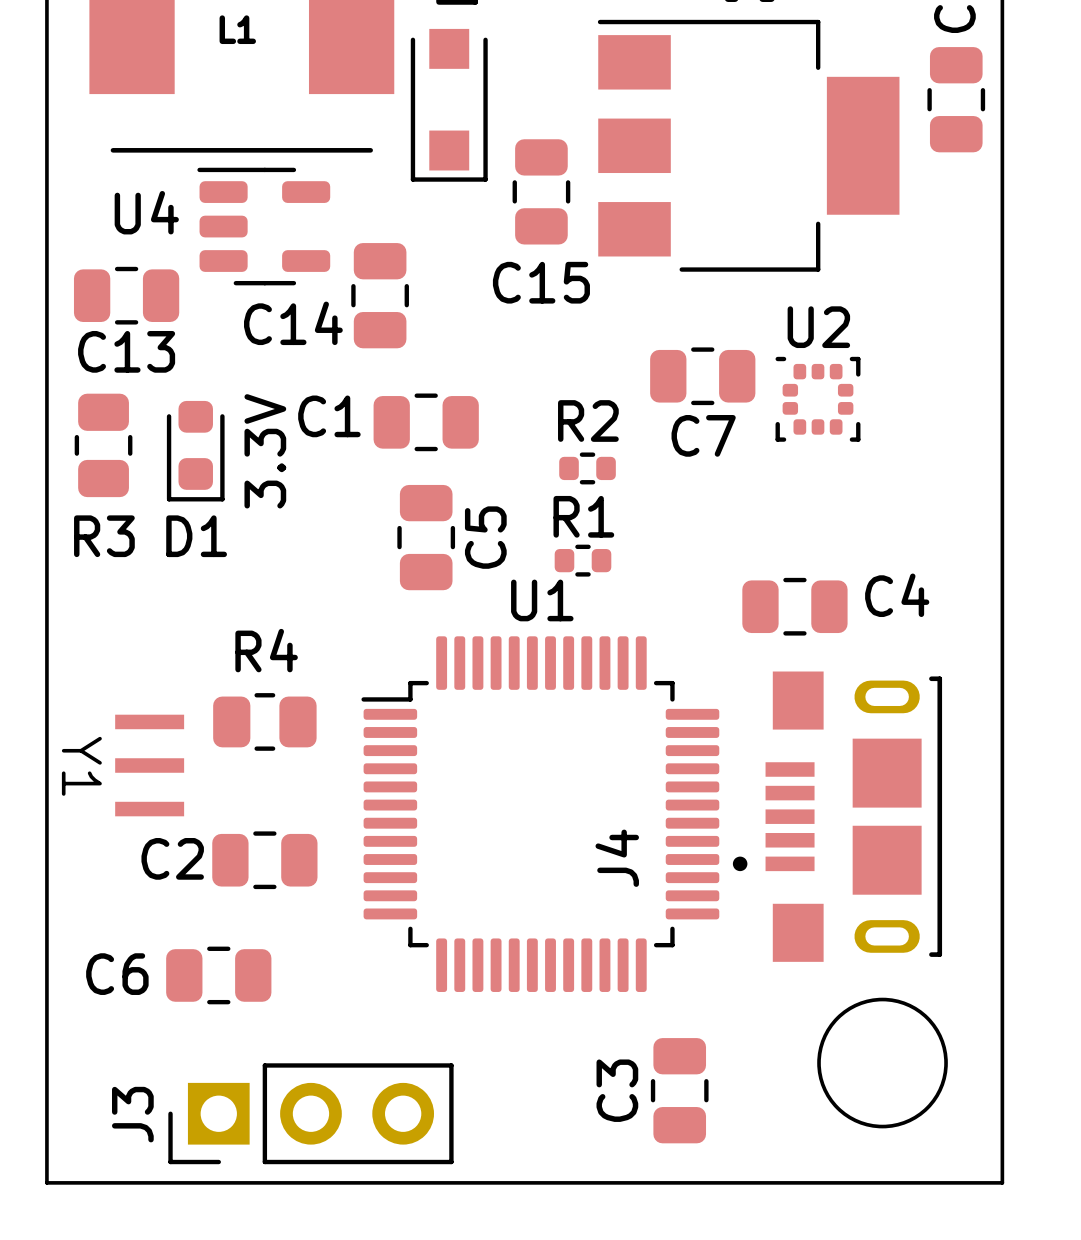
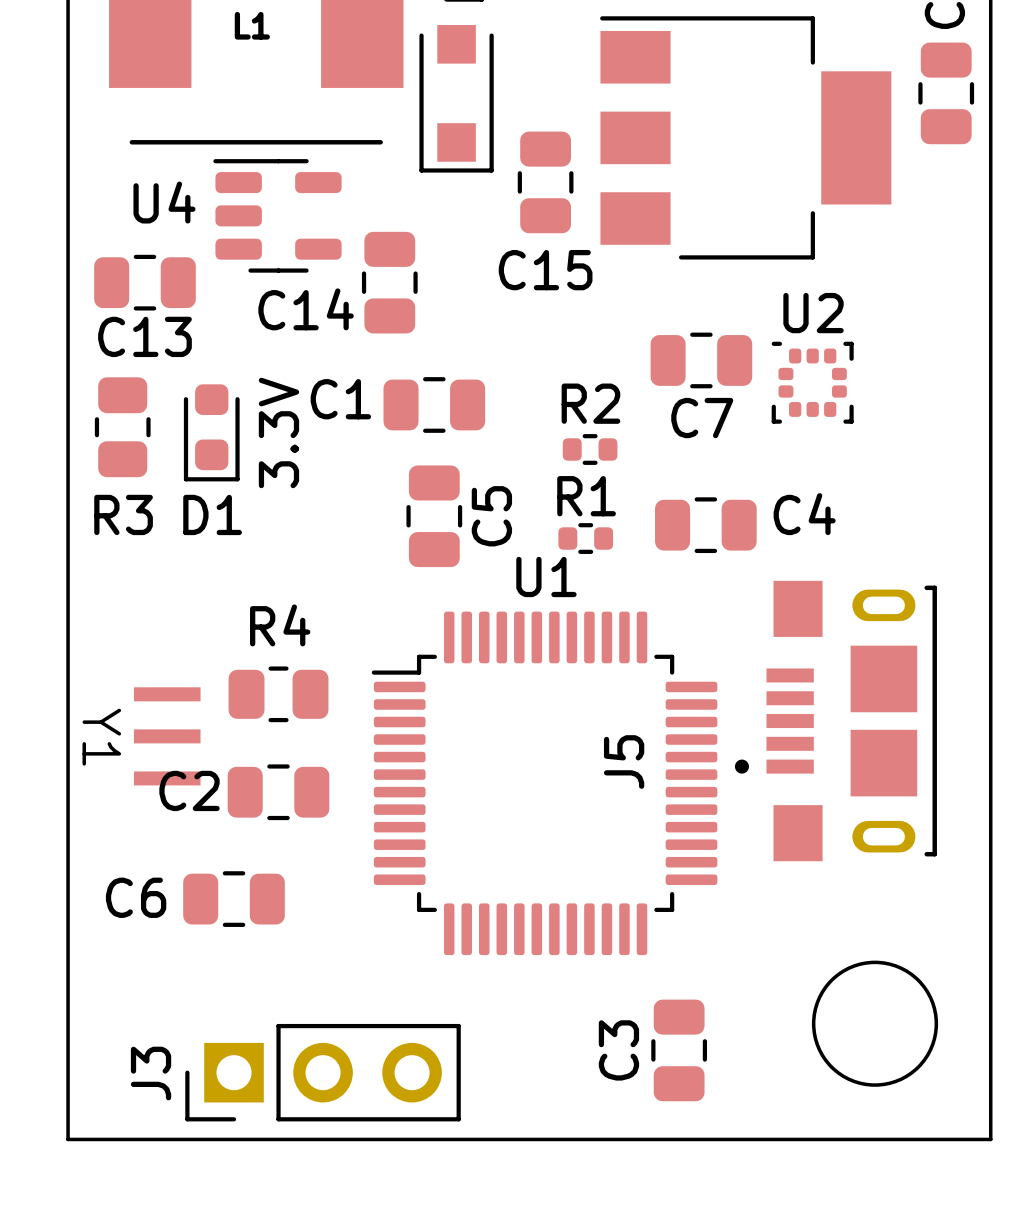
C4 position: (794, 606) -> (705, 525)
J5: none -> (835, 721)
J4: (837, 816) -> none
C2 position: (264, 860) -> (278, 792)
C6 position: (218, 975) -> (234, 899)

